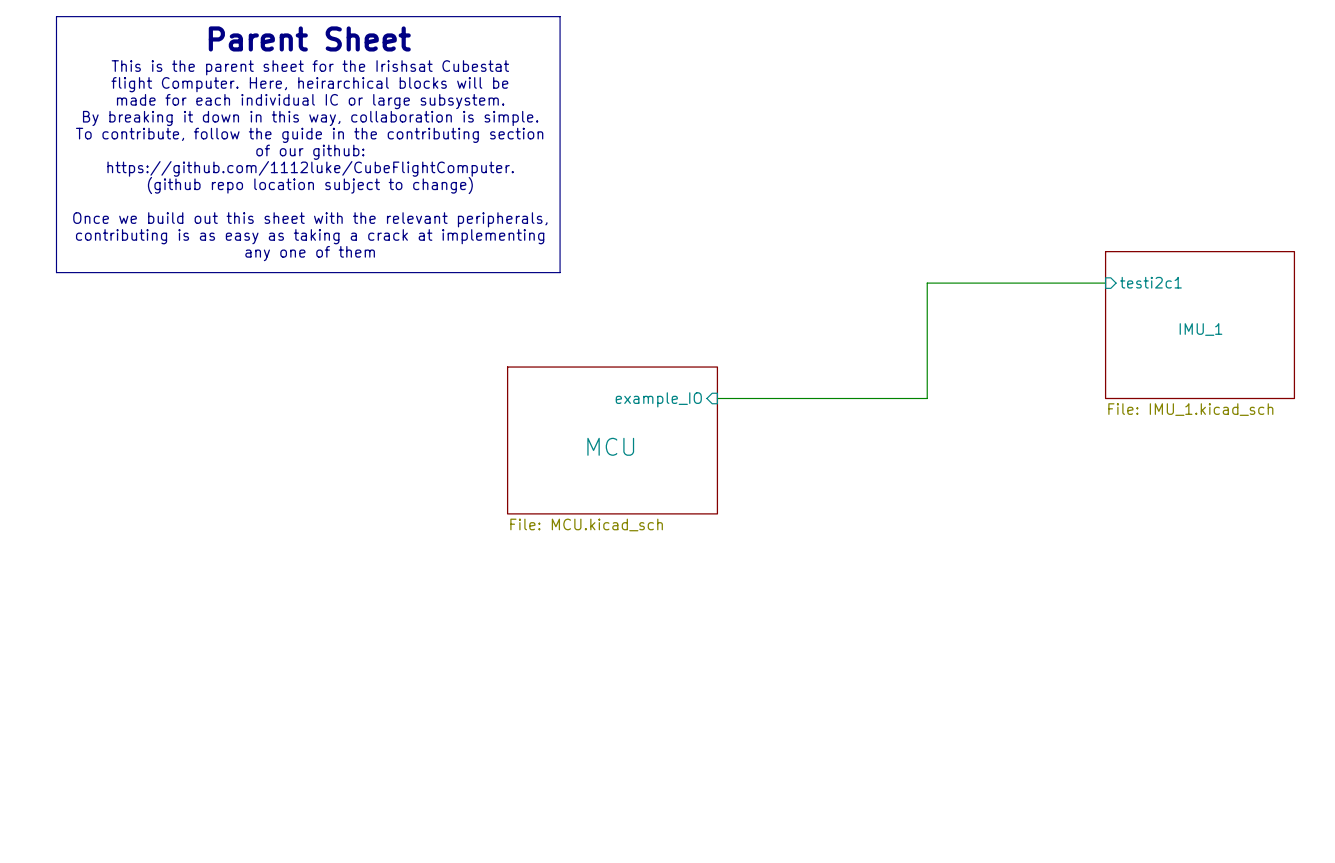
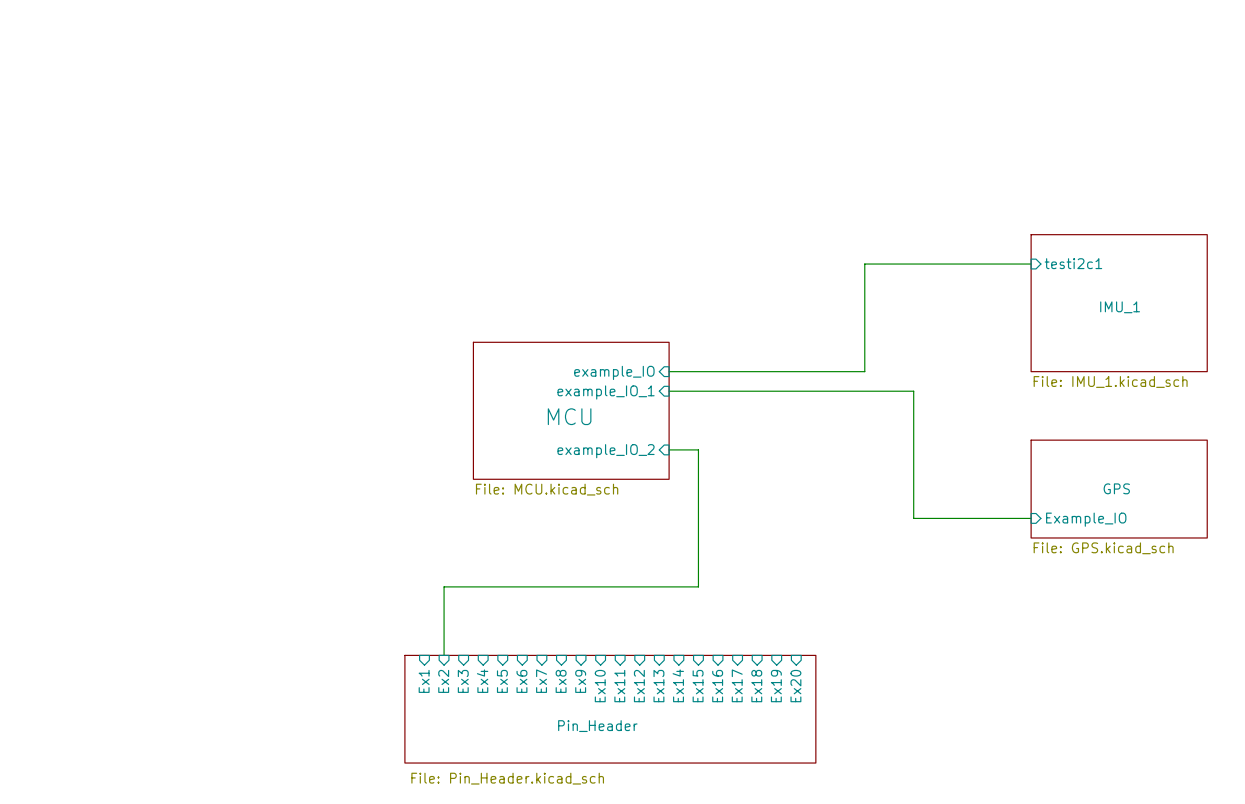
line: (56, 16) (560, 16) (560, 272) (56, 272) (56, 16) -> none
text: Parent Sheet (309, 38) -> none
text: This is the parent sheet for the Irishsat Cubestat (310, 67) -> none
text: flight Computer. Here, heirarchical blocks will be (309, 84) -> none
text: made for each individual IC or large subsystem. (310, 101) -> none
text: By breaking it down in this way, collaboration is simple. (310, 118) -> none
text: To contribute, follow the guide in the contributing section (309, 135) -> none
text: of our github: (310, 152) -> none
text: https://github.com/1112luke/CubeFlightComputer. (310, 168) -> none
text: (github repo location subject to change) (310, 185) -> none
text: Once we build out this sheet with the relevant peripherals, (310, 219) -> none
text: contributing is as easy as taking a crack at implementing (310, 236) -> none
text: any one of them (310, 253) -> none
wire: none -> (669, 391) (913, 391) (913, 518) (1031, 518)
sheet pin: none -> example_IO_1 (606, 392)
wire: none -> (669, 449) (698, 449) (698, 586) (444, 586) (444, 655)
sheet pin: none -> example_IO_2 (606, 451)
sheet GPS: none -> File: GPS.kicad_sch (1119, 489)
sheet pin: none -> Example_IO (1086, 519)
sheet pin: none -> Ex1 (424, 681)
sheet pin: none -> Ex2 (443, 681)
sheet pin: none -> Ex3 (463, 681)
sheet pin: none -> Ex4 (482, 681)
sheet pin: none -> Ex5 (502, 681)
sheet pin: none -> Ex6 (521, 681)
sheet pin: none -> Ex7 (541, 681)
sheet pin: none -> Ex8 (561, 681)
sheet pin: none -> Ex9 (580, 681)
sheet pin: none -> Ex10 (600, 686)
sheet pin: none -> Ex11 (619, 686)
sheet pin: none -> Ex12 (639, 686)
sheet pin: none -> Ex13 (658, 686)
sheet pin: none -> Ex14 (678, 685)
sheet pin: none -> Ex15 (698, 686)
sheet pin: none -> Ex16 (717, 686)
sheet pin: none -> Ex17 (737, 685)
sheet pin: none -> Ex18 (756, 686)
sheet pin: none -> Ex19 (776, 686)
sheet pin: none -> Ex20 (795, 686)
sheet Pin_Header: none -> File: Pin_Header.kicad_sch (610, 709)

